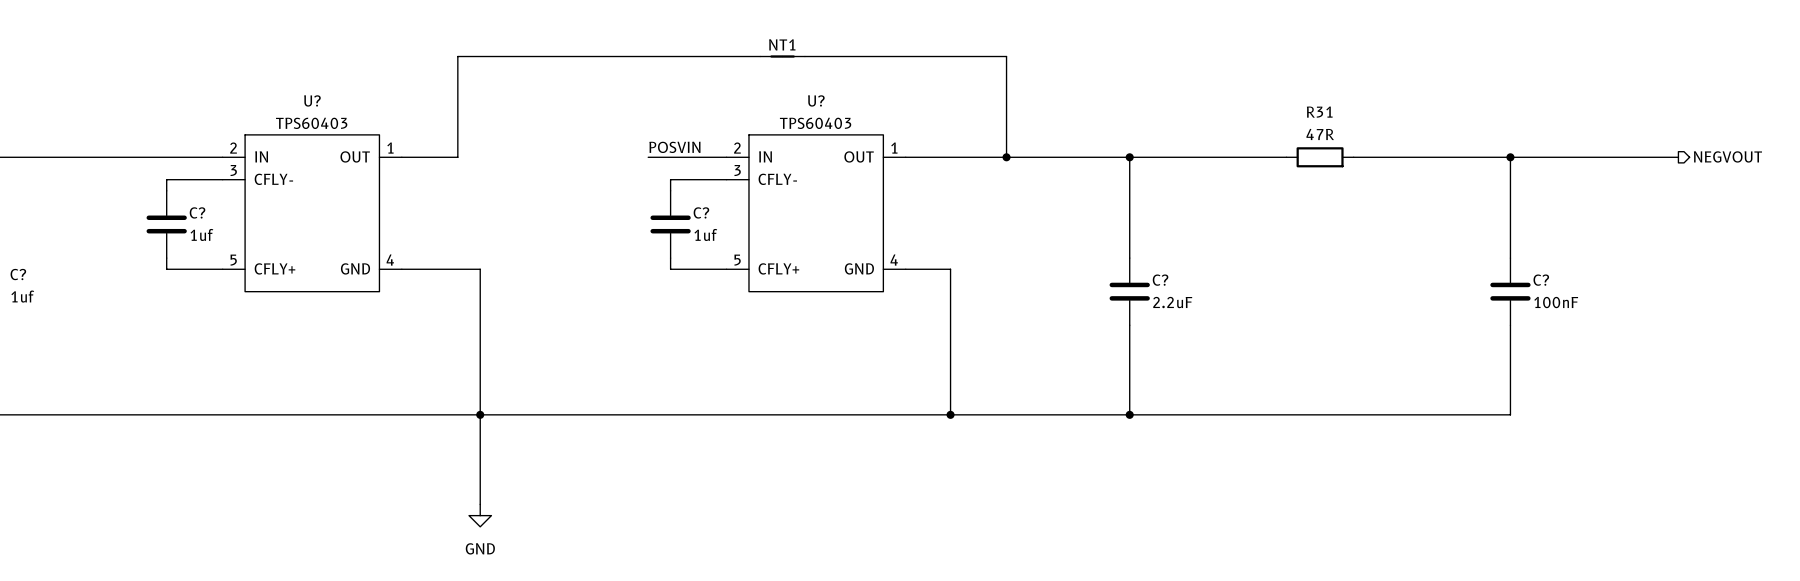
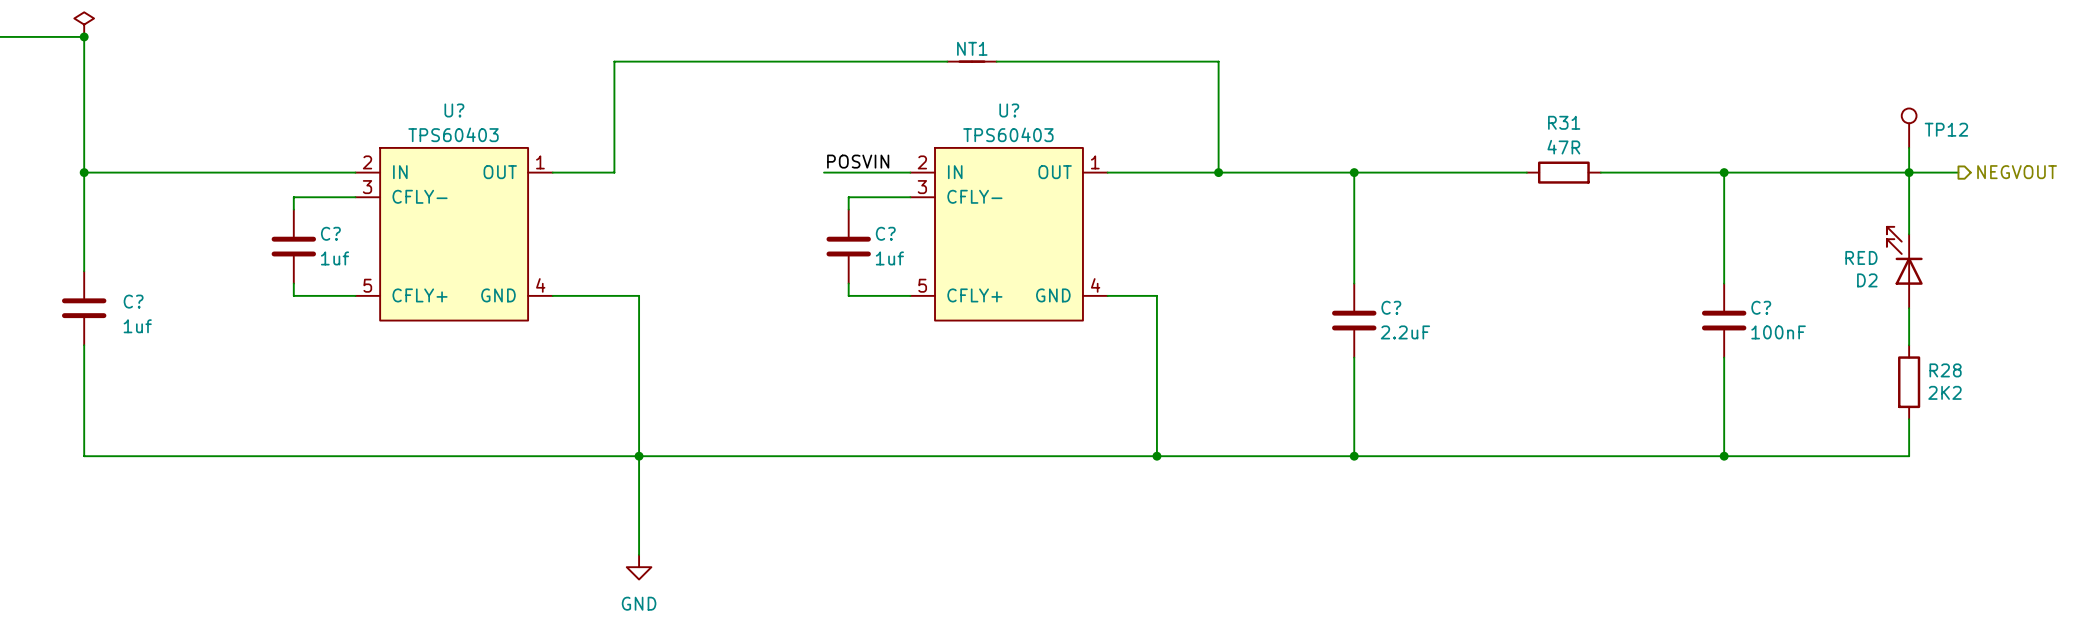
TP12: none -> (1909, 128)
wire: none -> (1909, 147) (1909, 234)
wire: (1510, 157) (1510, 258) -> (1724, 172) (1724, 283)
junction position: (1510, 157) -> (1724, 172)
junction: none -> (1909, 172)
D2: none -> RED (1904, 267)
wire: none -> (1909, 308) (1909, 345)
C? position: (1510, 291) -> (1724, 320)
wire: none -> (1724, 357) (1724, 456)
wire: (1510, 325) (1510, 414) -> (1909, 419) (1909, 456) (1773, 456)
R28: none -> 2K2 (1909, 382)
junction: none -> (1724, 456)

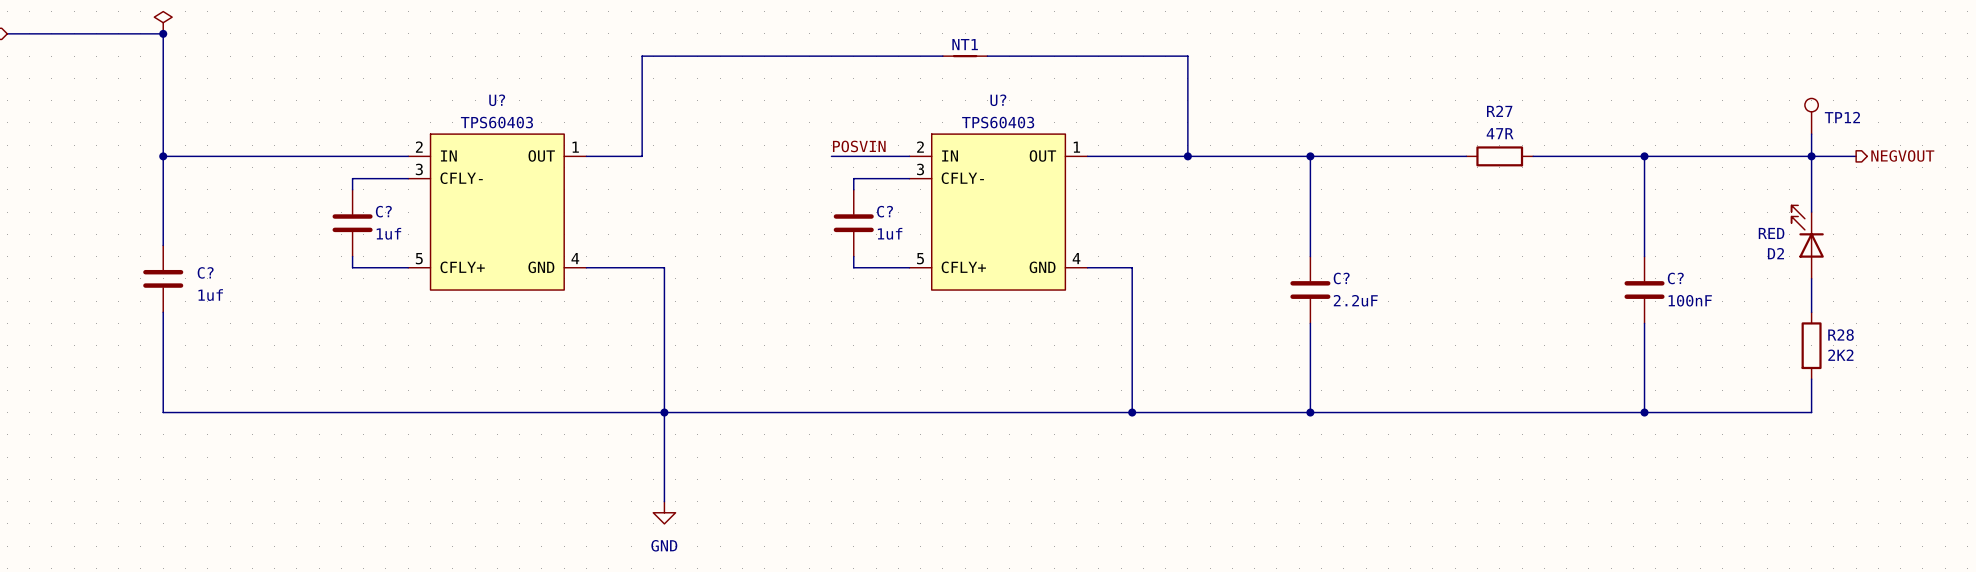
R31 name: R31 (1564, 122) -> R27 (1499, 111)

